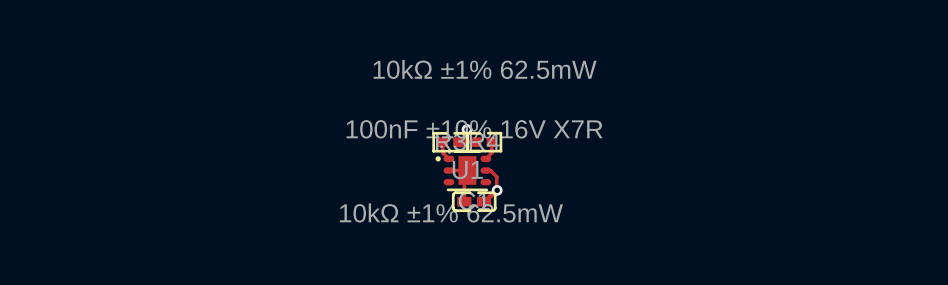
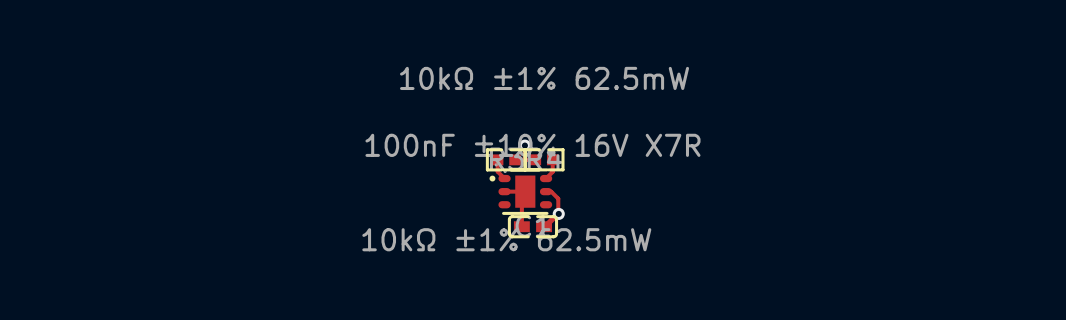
U1 name: U1 (467, 169) -> none

